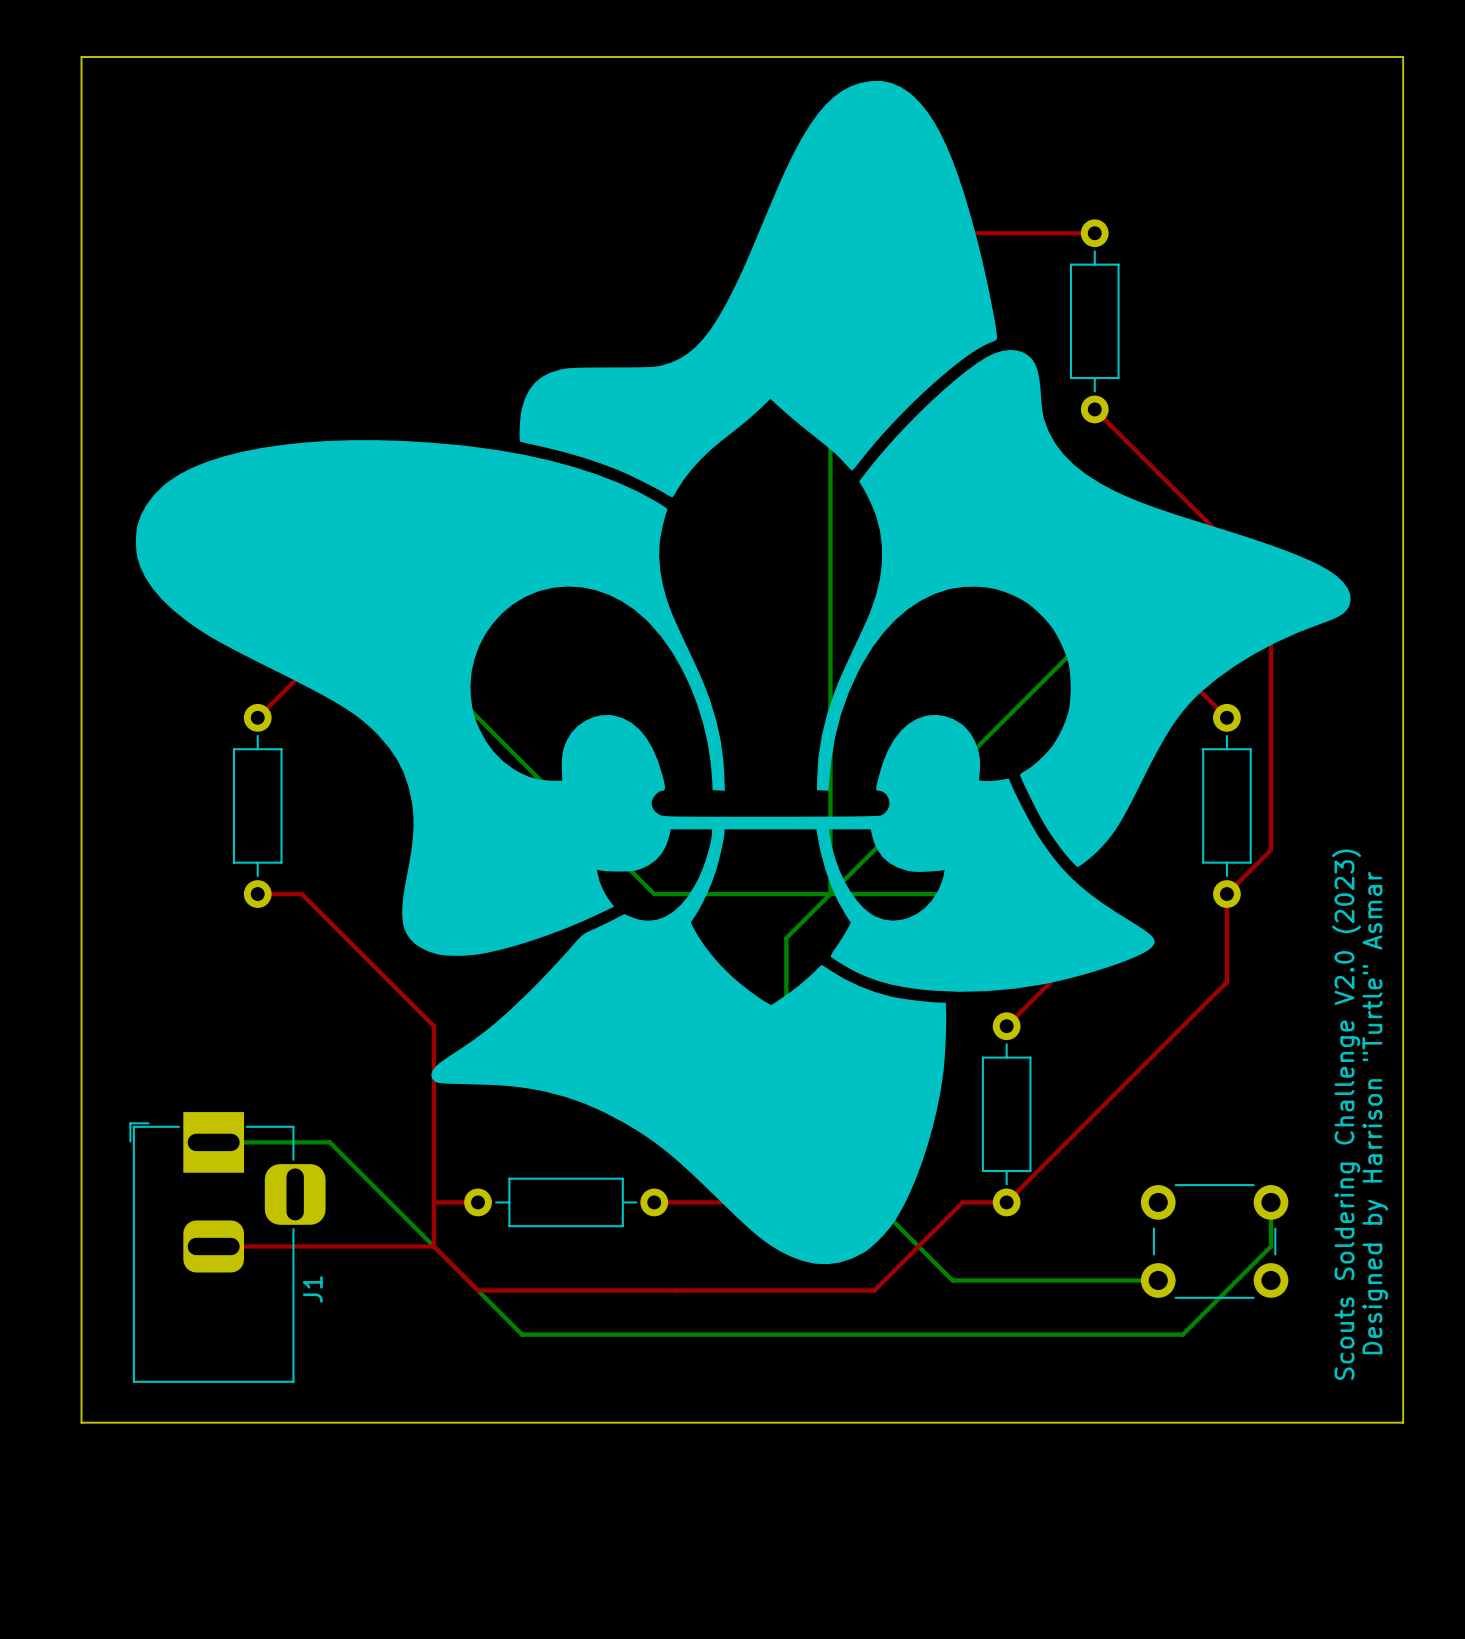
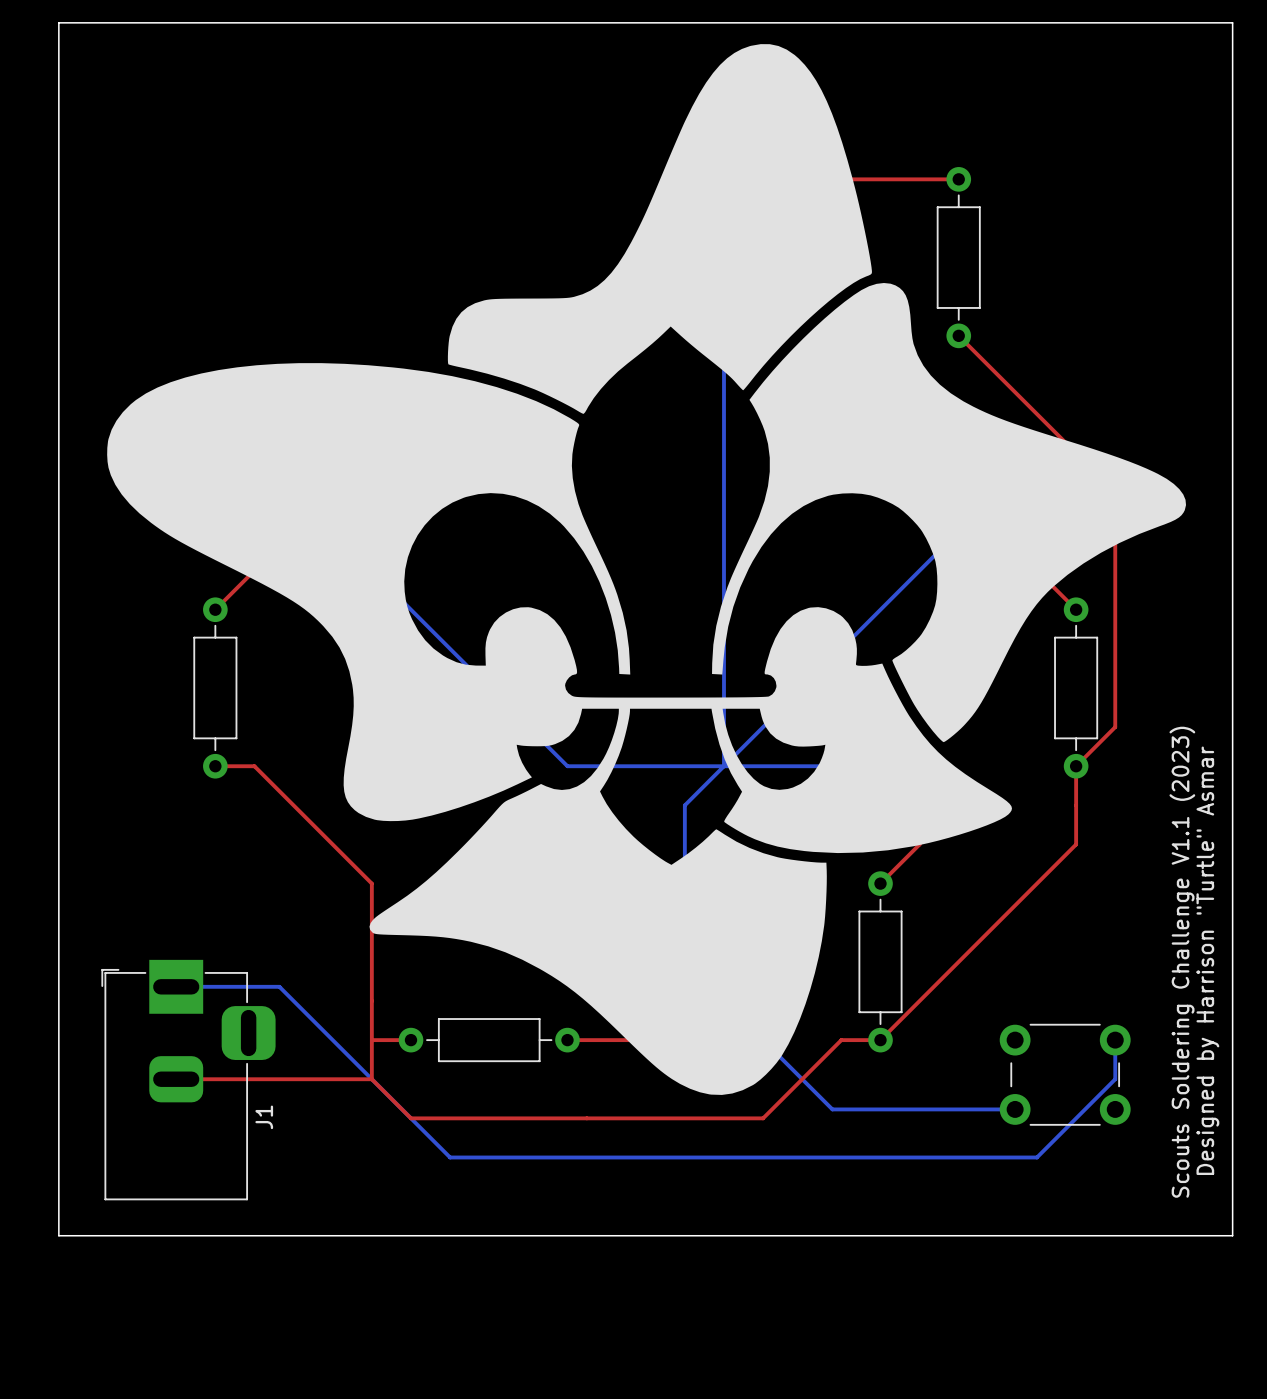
text: Scouts Soldering Challenge V2.0 (2023) (1346, 1114) -> Scouts Soldering Challenge V1.1 (2023) (1182, 962)

